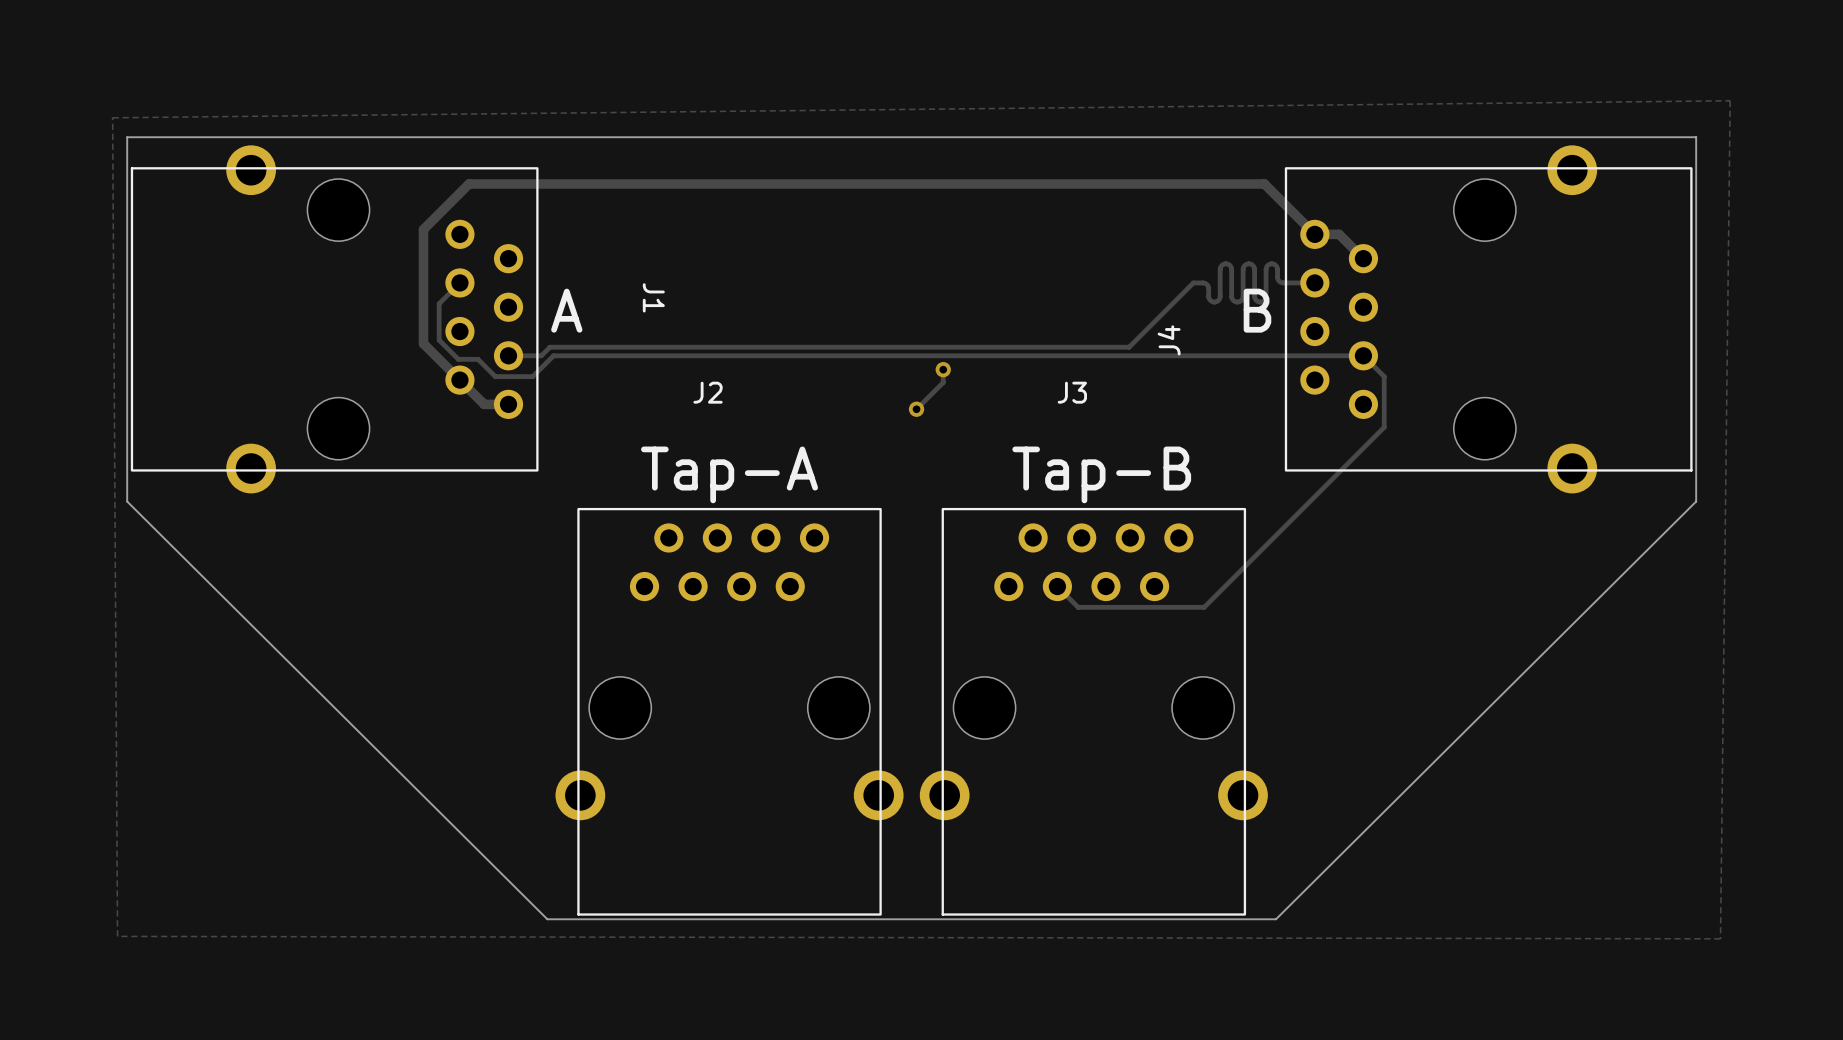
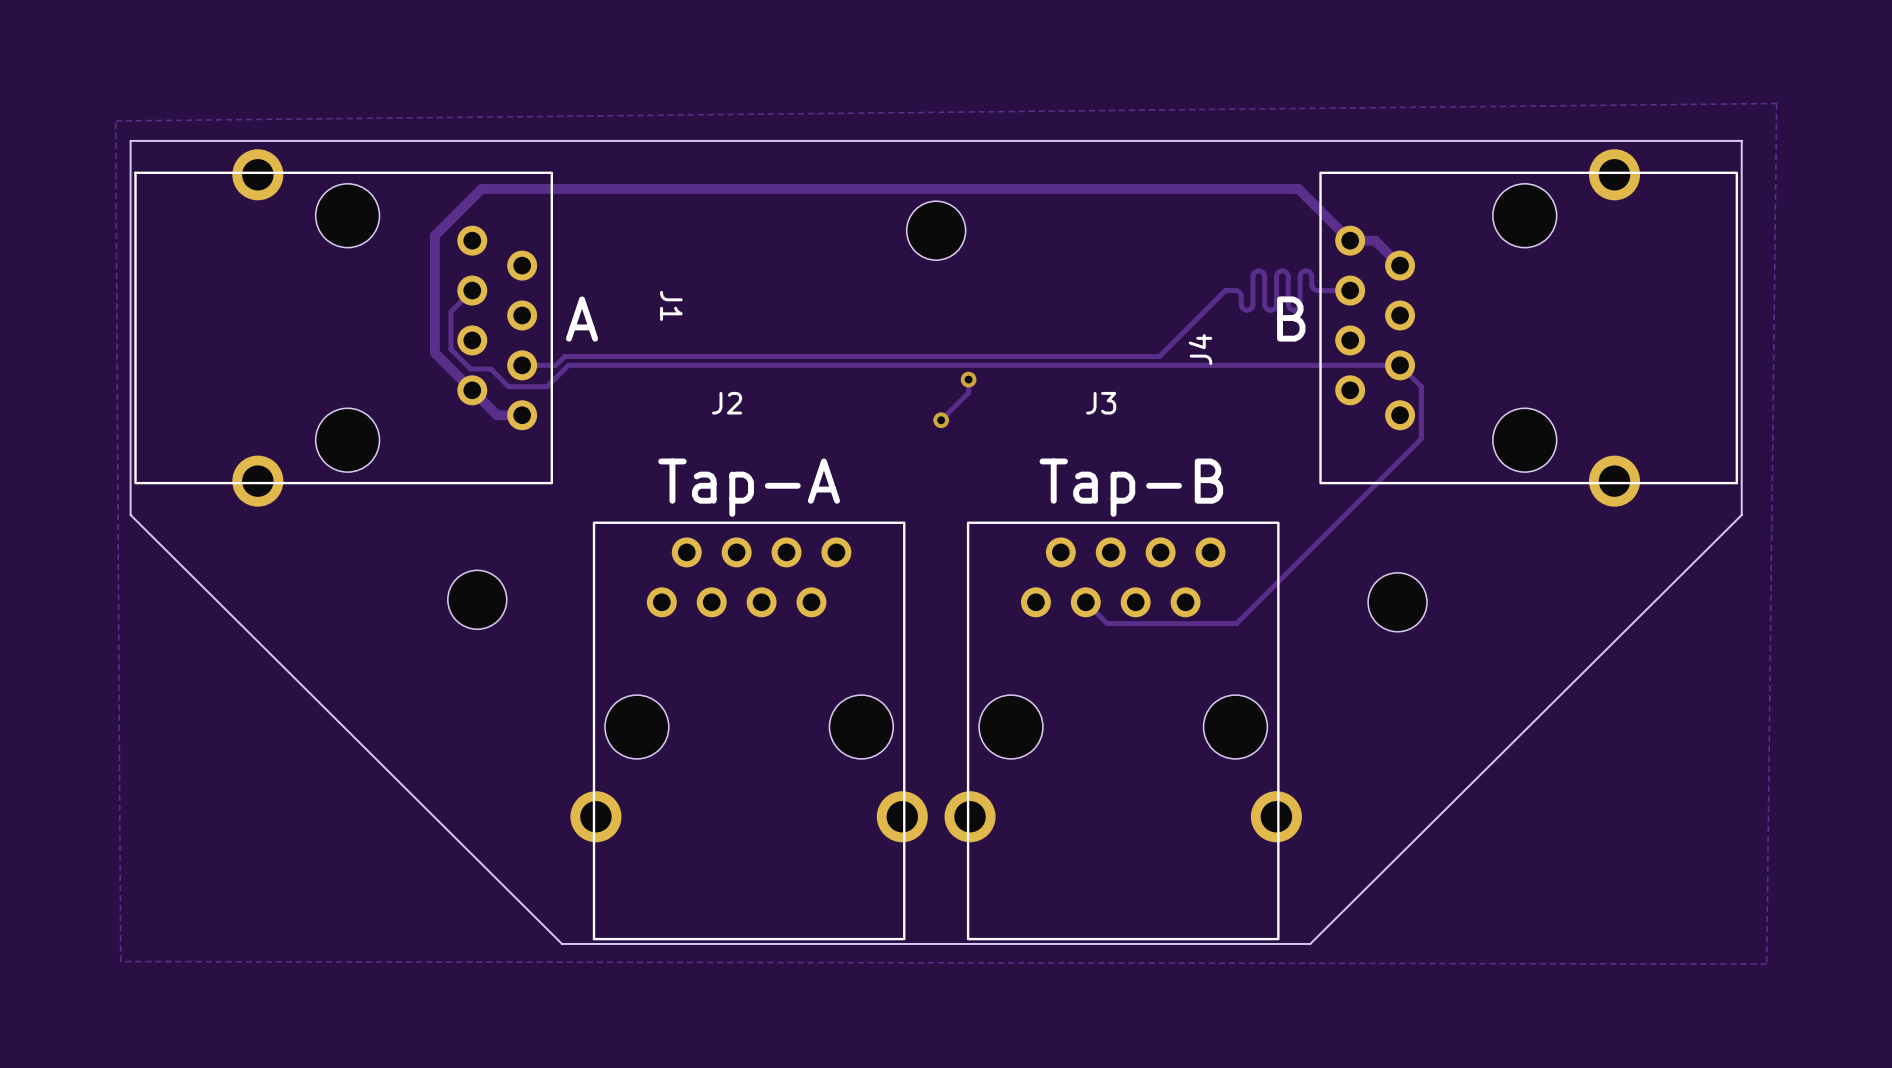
part: none -> (936, 230)
part: none -> (477, 599)
part: none -> (1397, 602)

